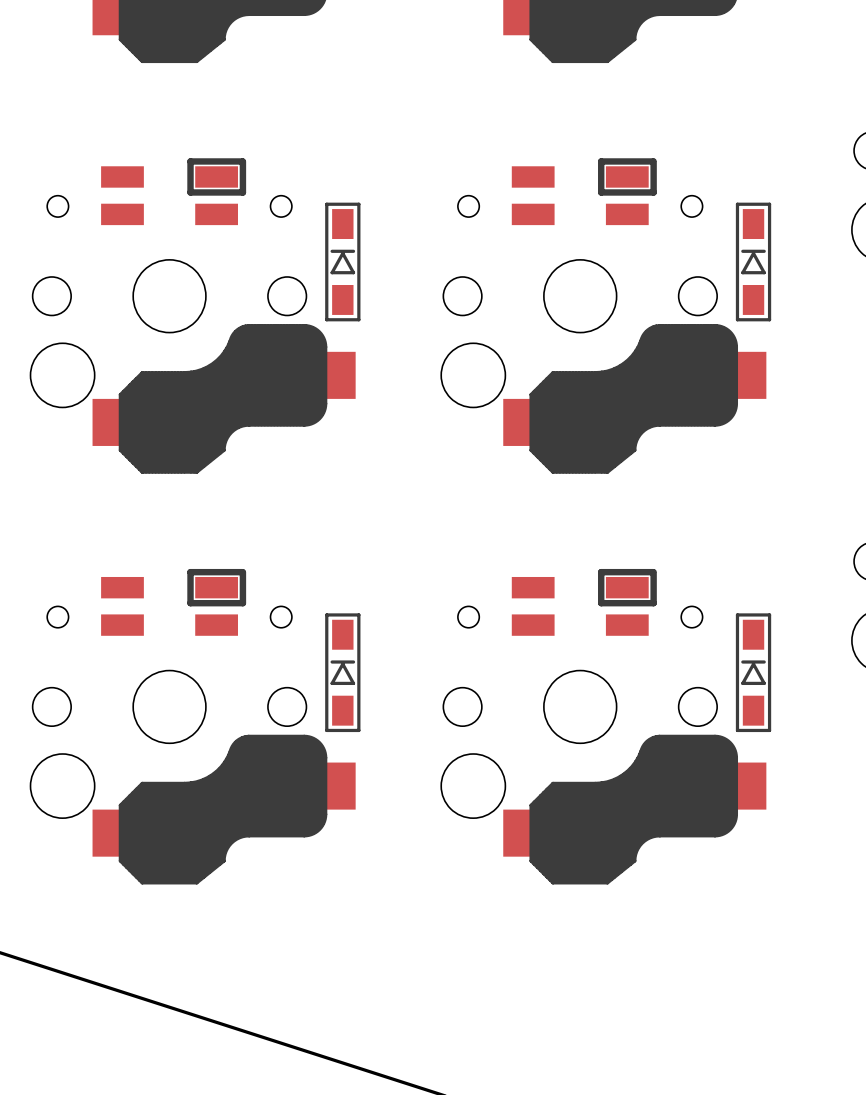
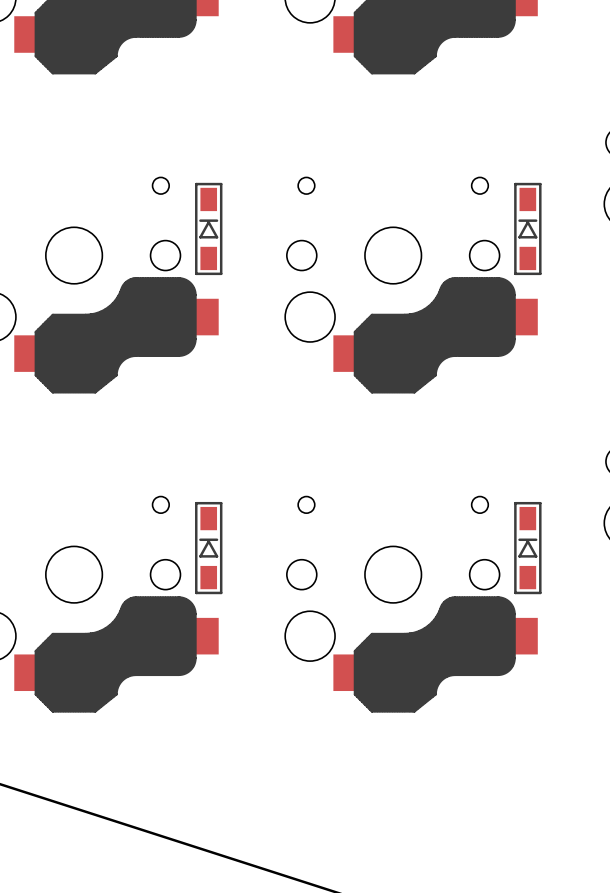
part: (173, 191) -> none
part: (584, 191) -> none
part: (173, 602) -> none
part: (584, 602) -> none

